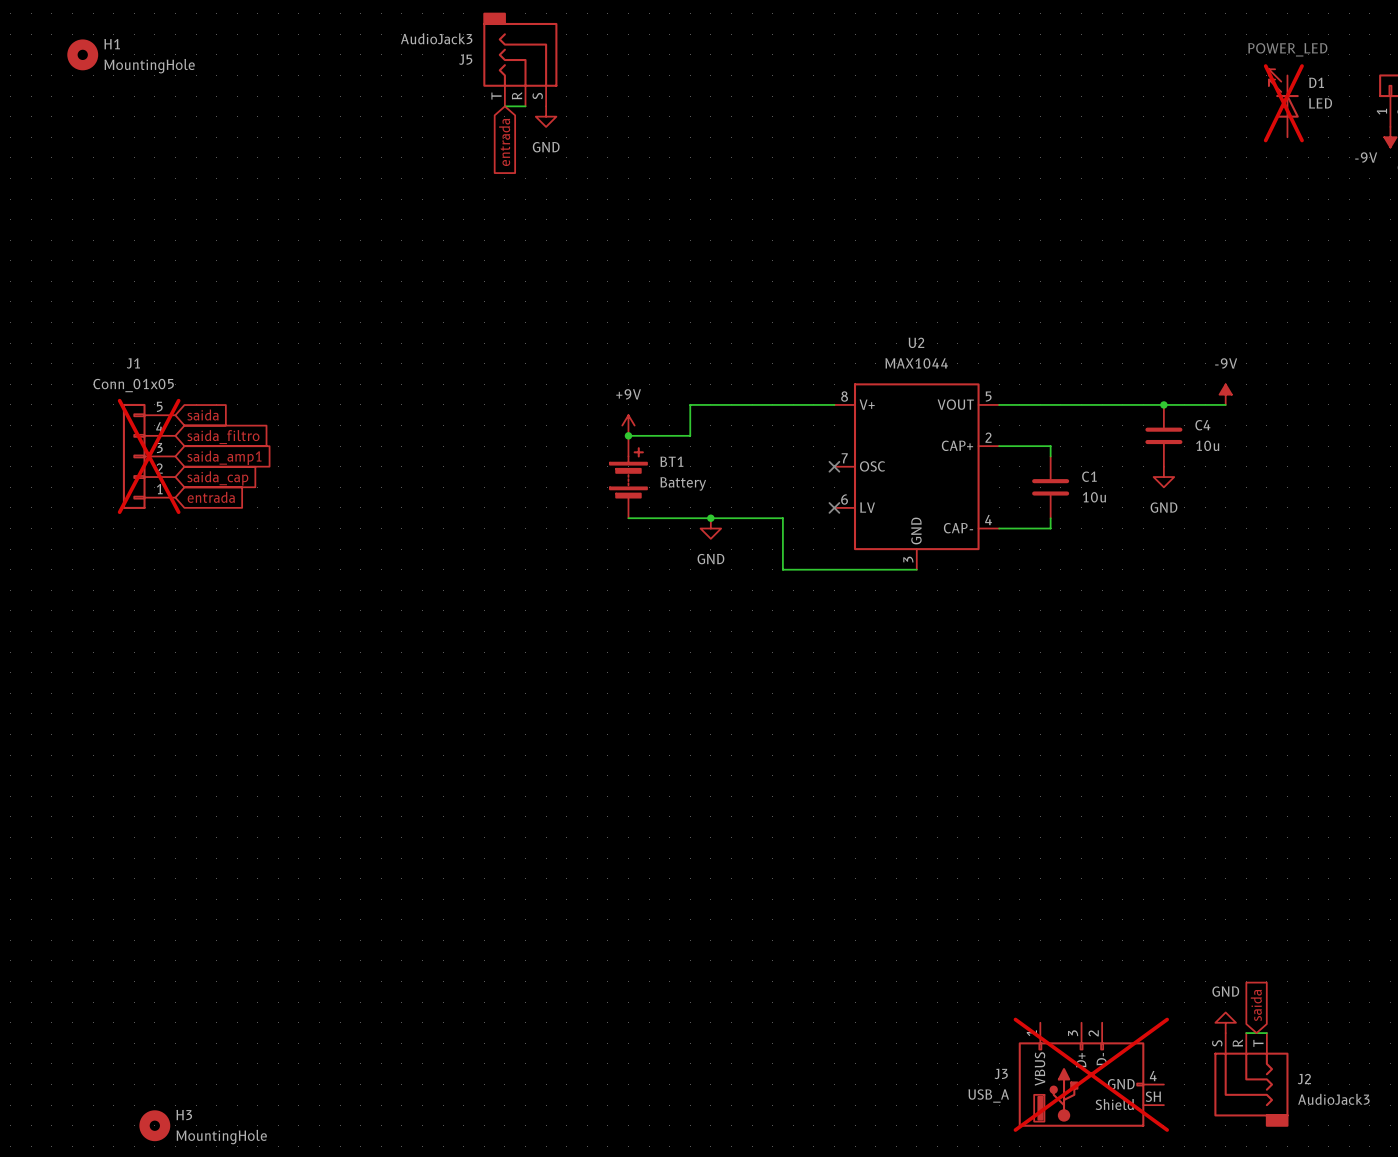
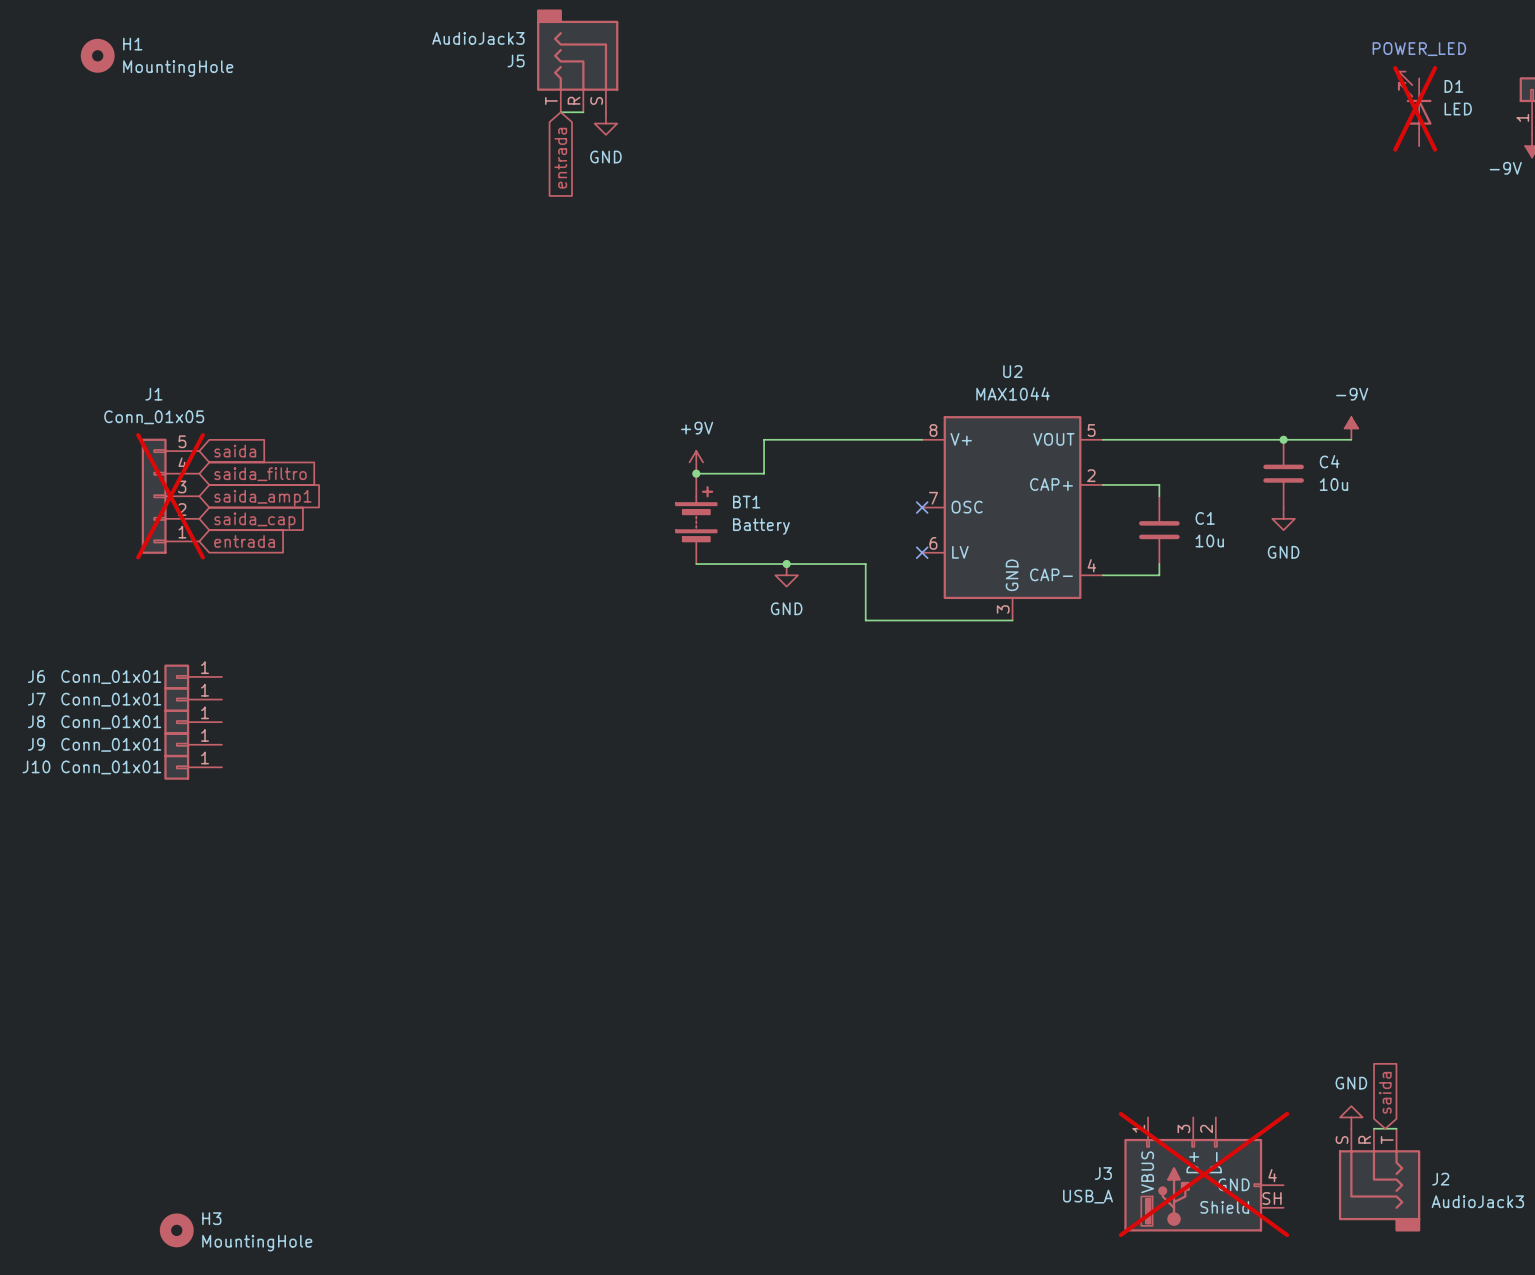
J6: none -> Conn_01x01 (193, 676)
J7: none -> Conn_01x01 (193, 699)
J8: none -> Conn_01x01 (193, 722)
J9: none -> Conn_01x01 (193, 744)
J10: none -> Conn_01x01 (193, 767)

